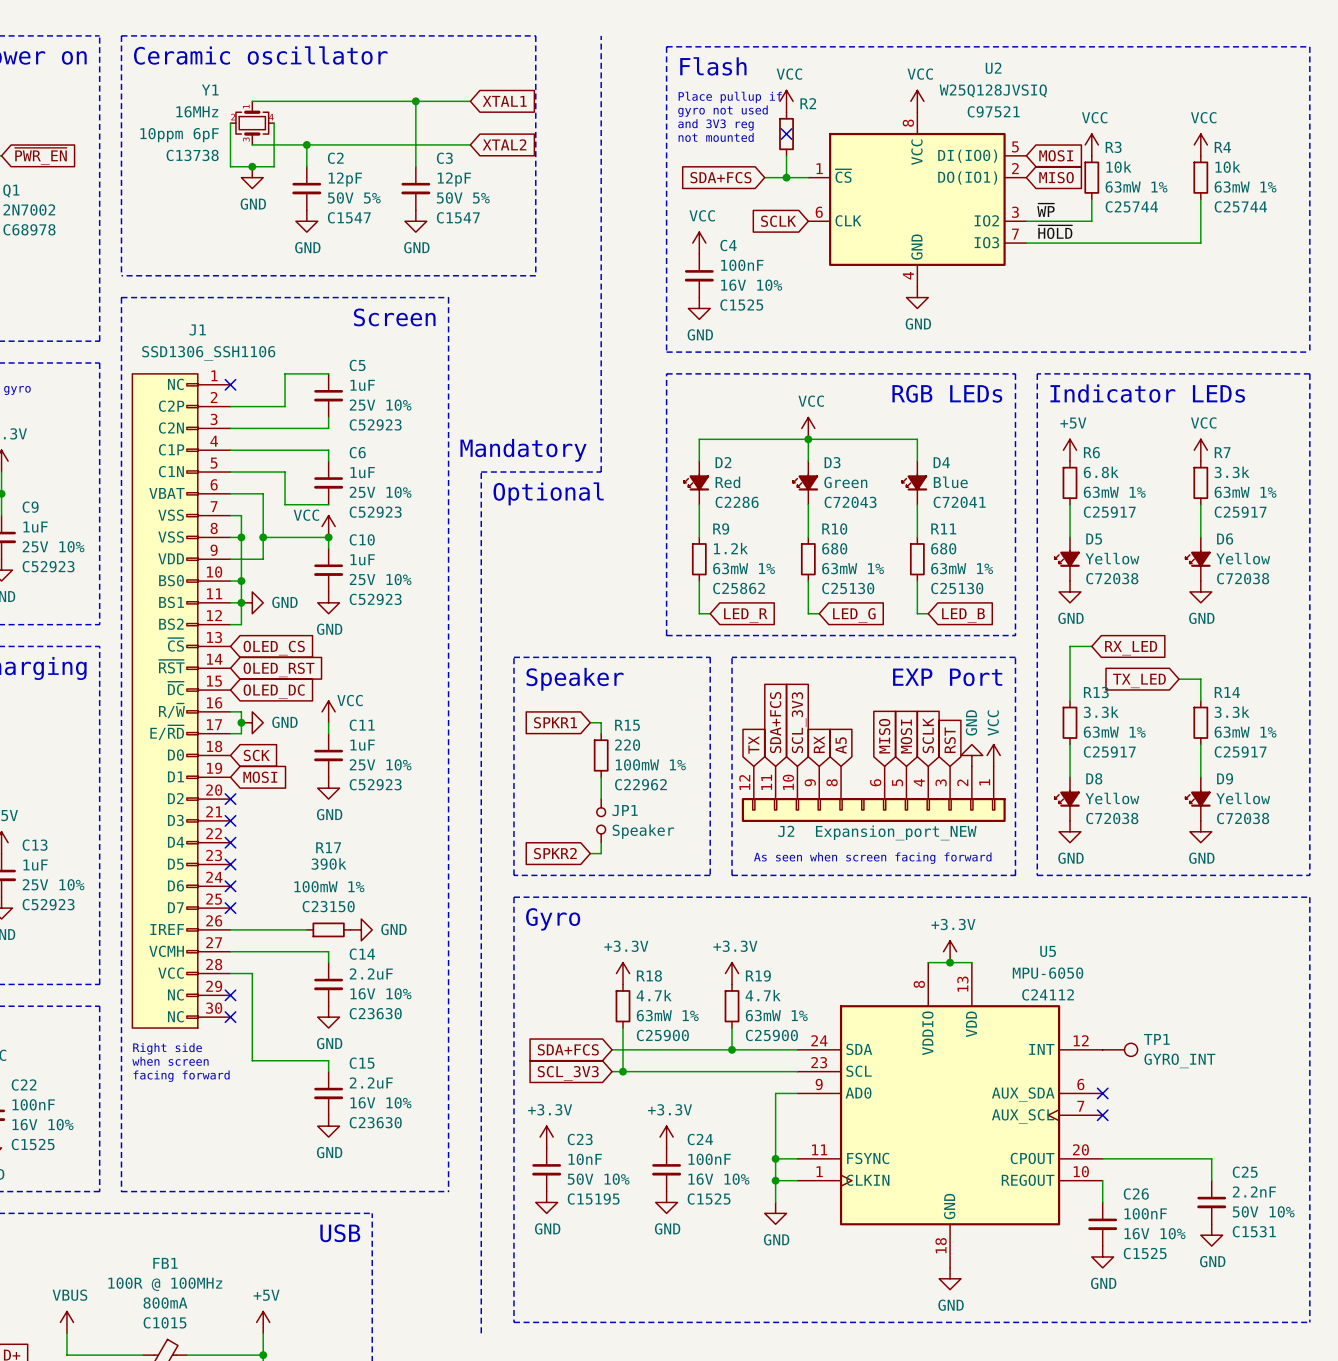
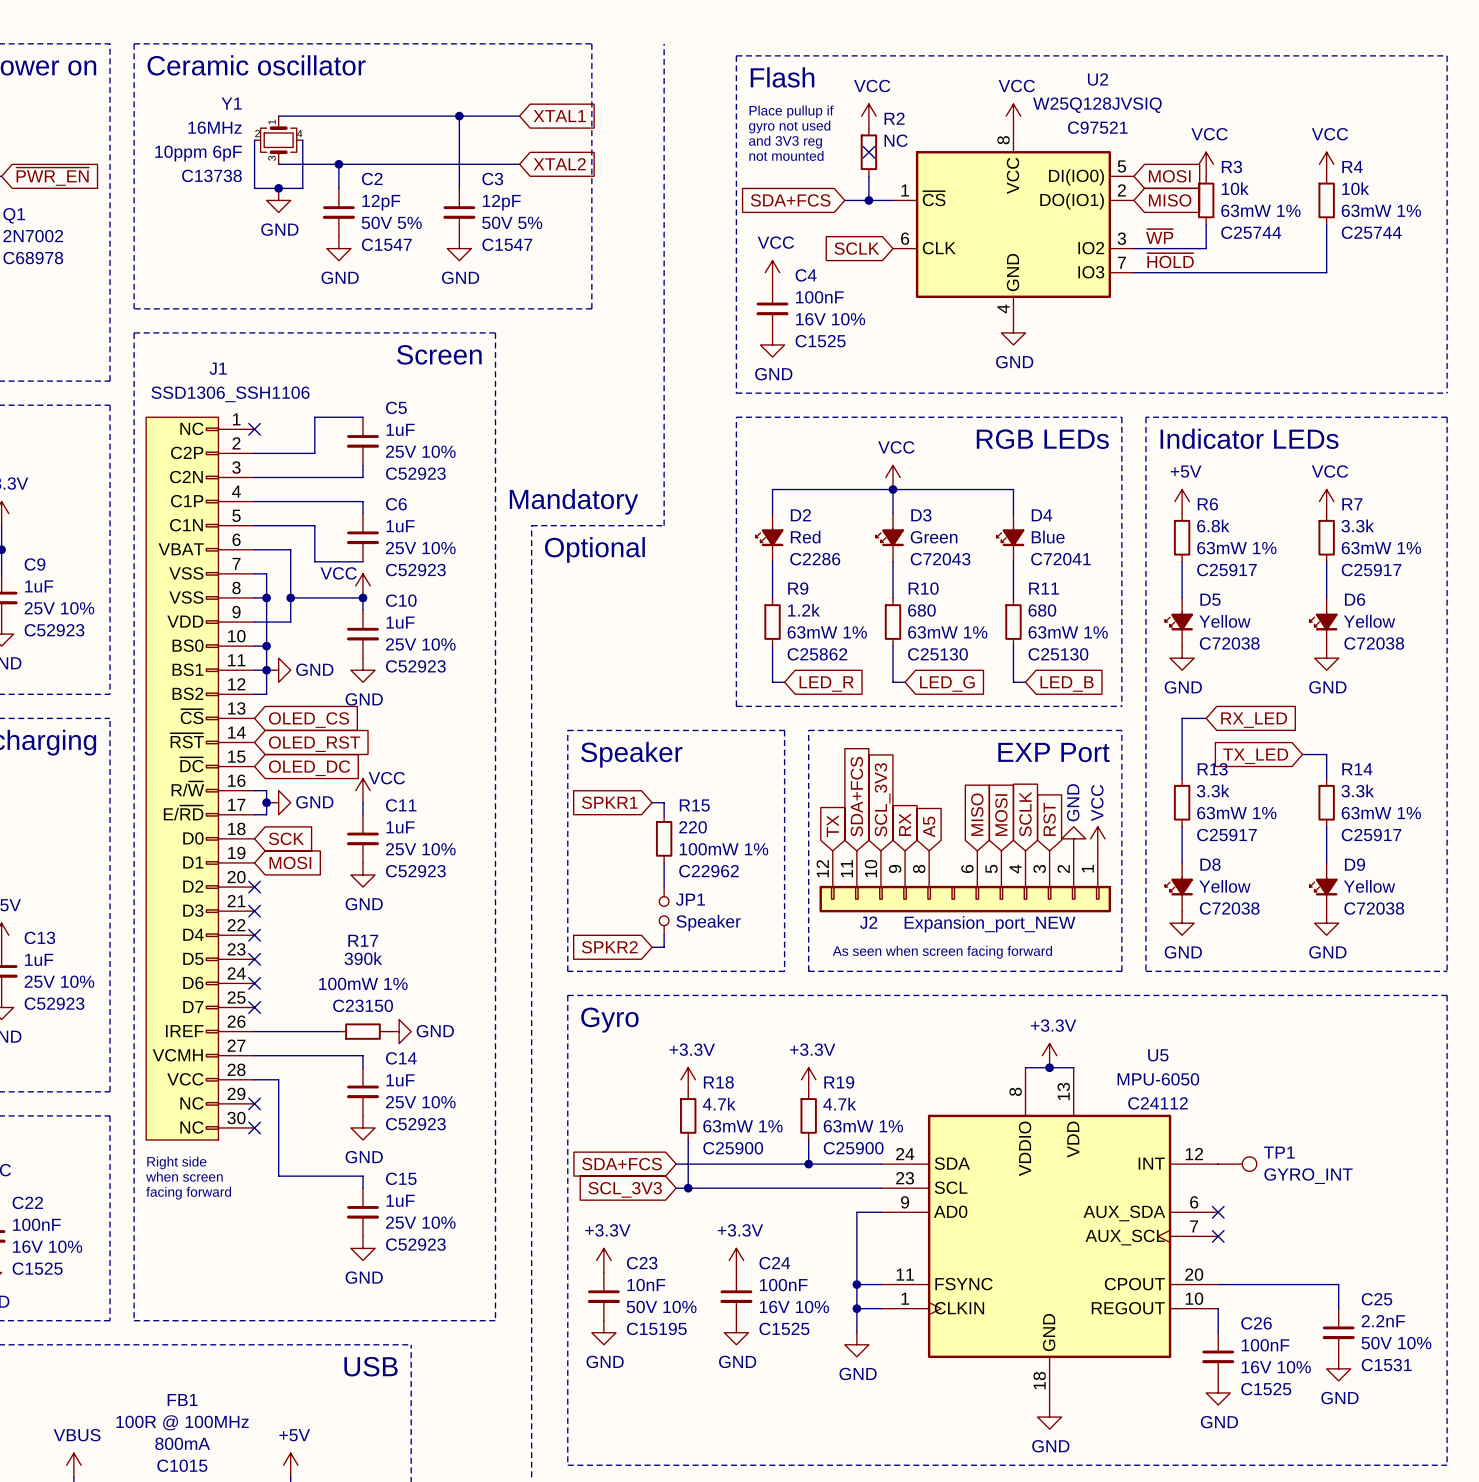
R2 value: none -> NC (896, 140)
C14 value: 2.2uF (371, 974) -> 1uF (400, 1080)
C14 text: 16V 10% (380, 993) -> 25V 10% (420, 1102)
C14 text: C23630 (375, 1013) -> C52923 (415, 1124)
C15 value: 2.2uF (371, 1083) -> 1uF (400, 1200)
C15 text: 16V 10% (380, 1102) -> 25V 10% (420, 1222)
C15 text: C23630 (375, 1122) -> C52923 (415, 1244)

